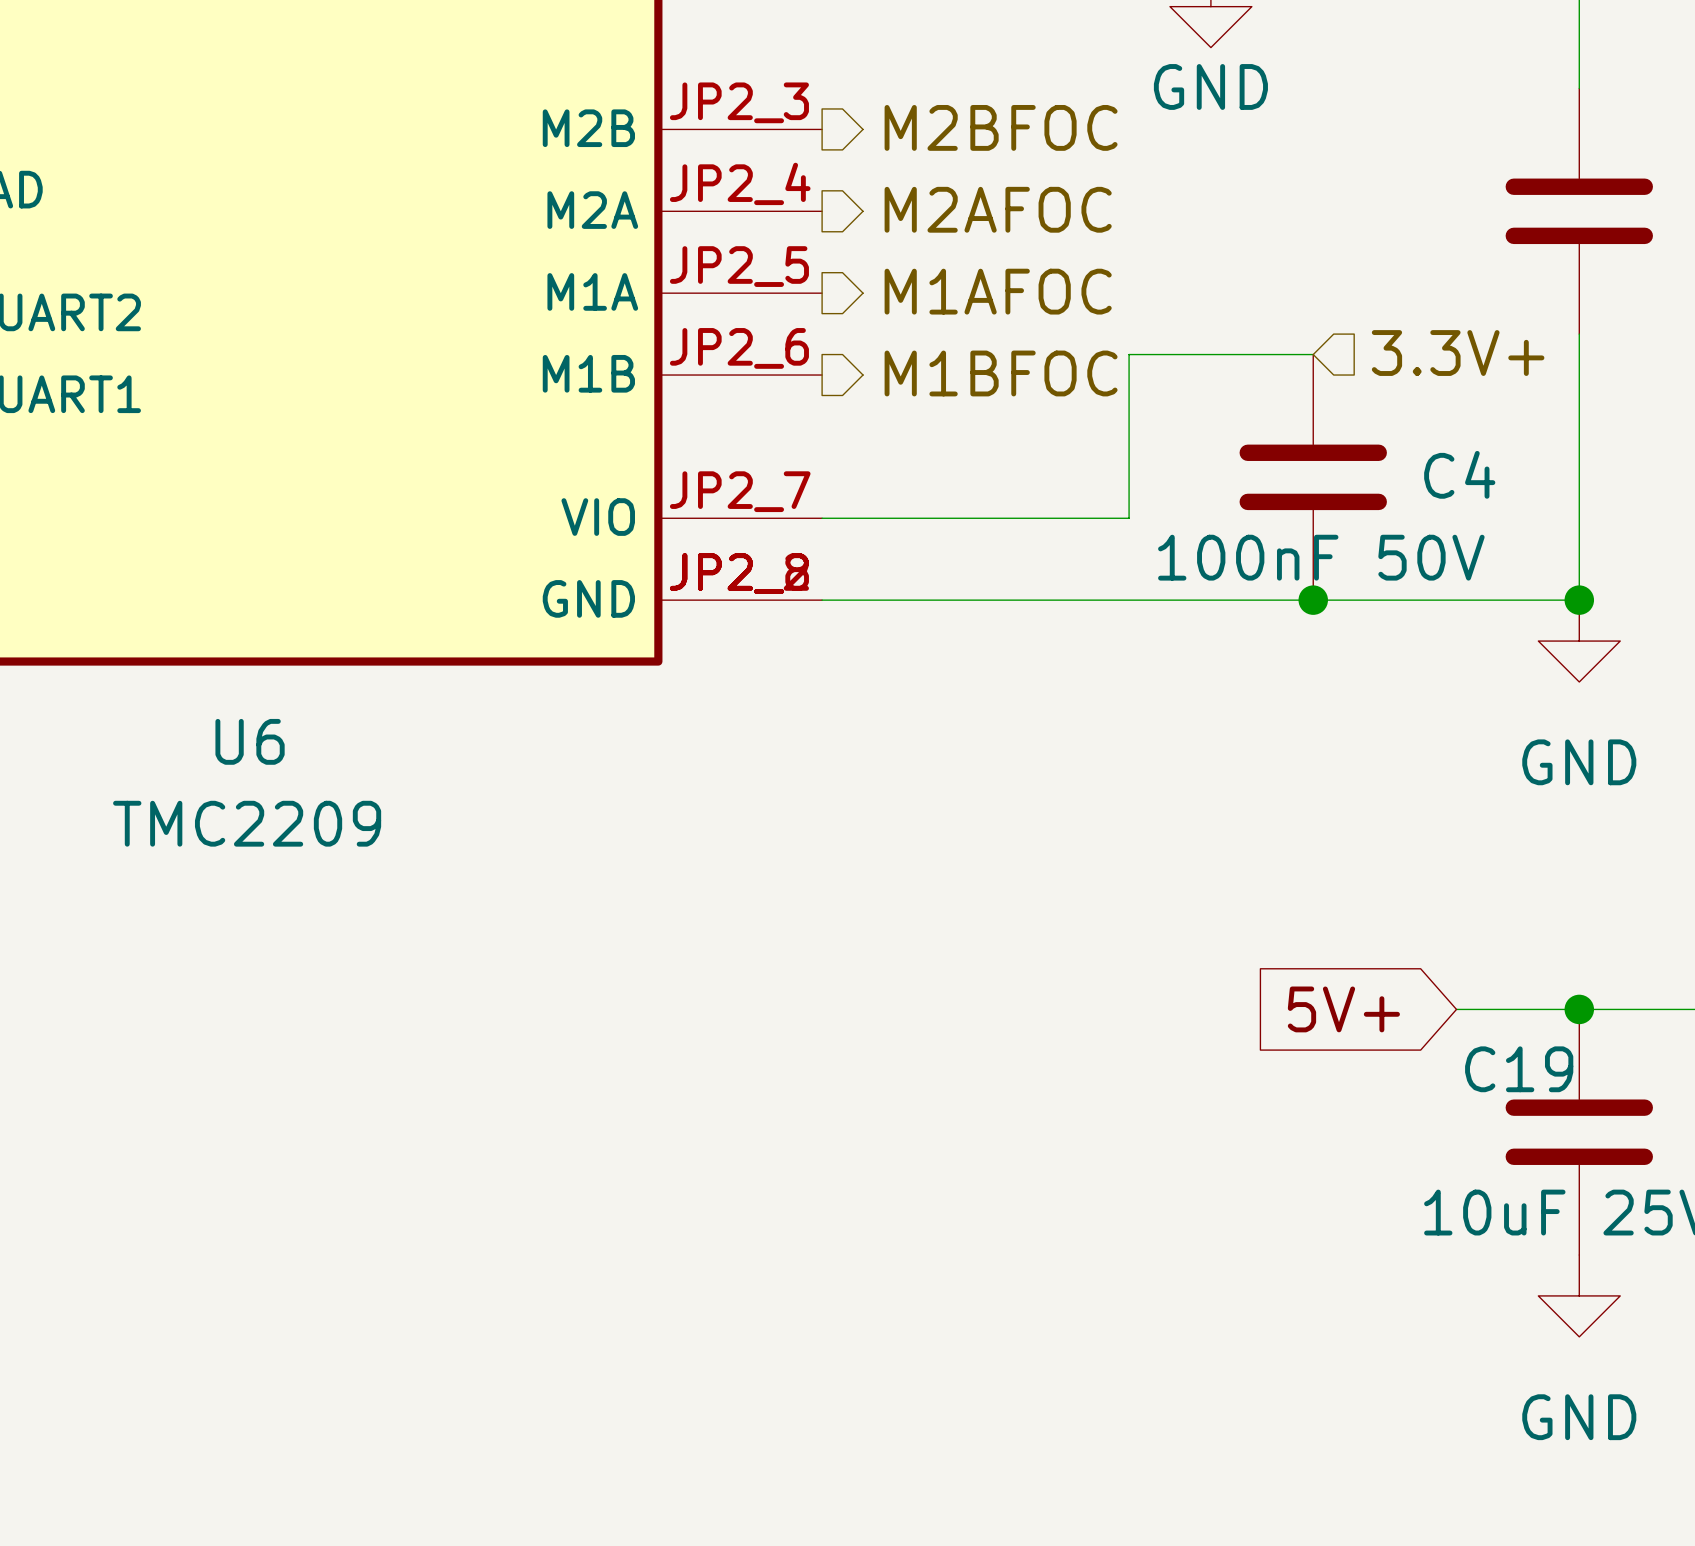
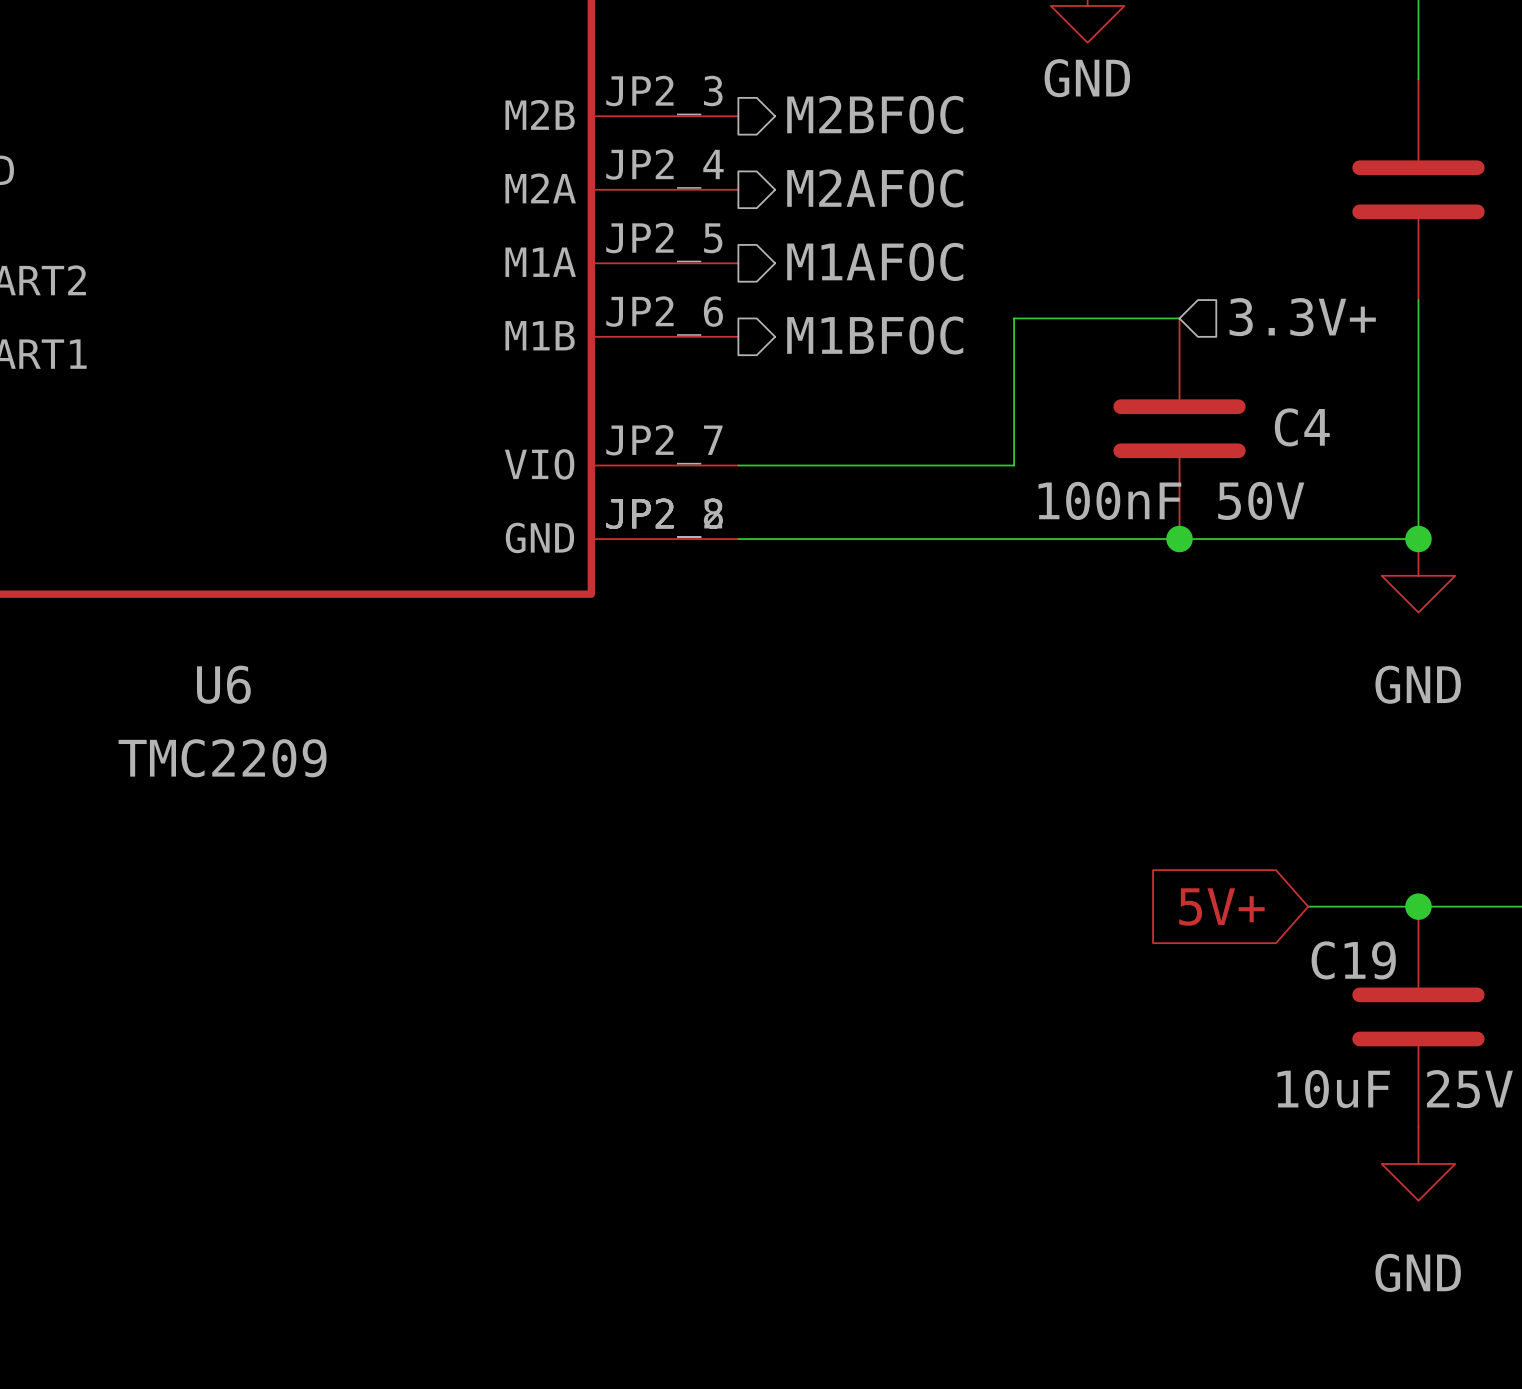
U6 name position: U6 (250, 741) -> U6 (223, 684)
U6 value position: TMC2209 (247, 823) -> TMC2209 (222, 758)

